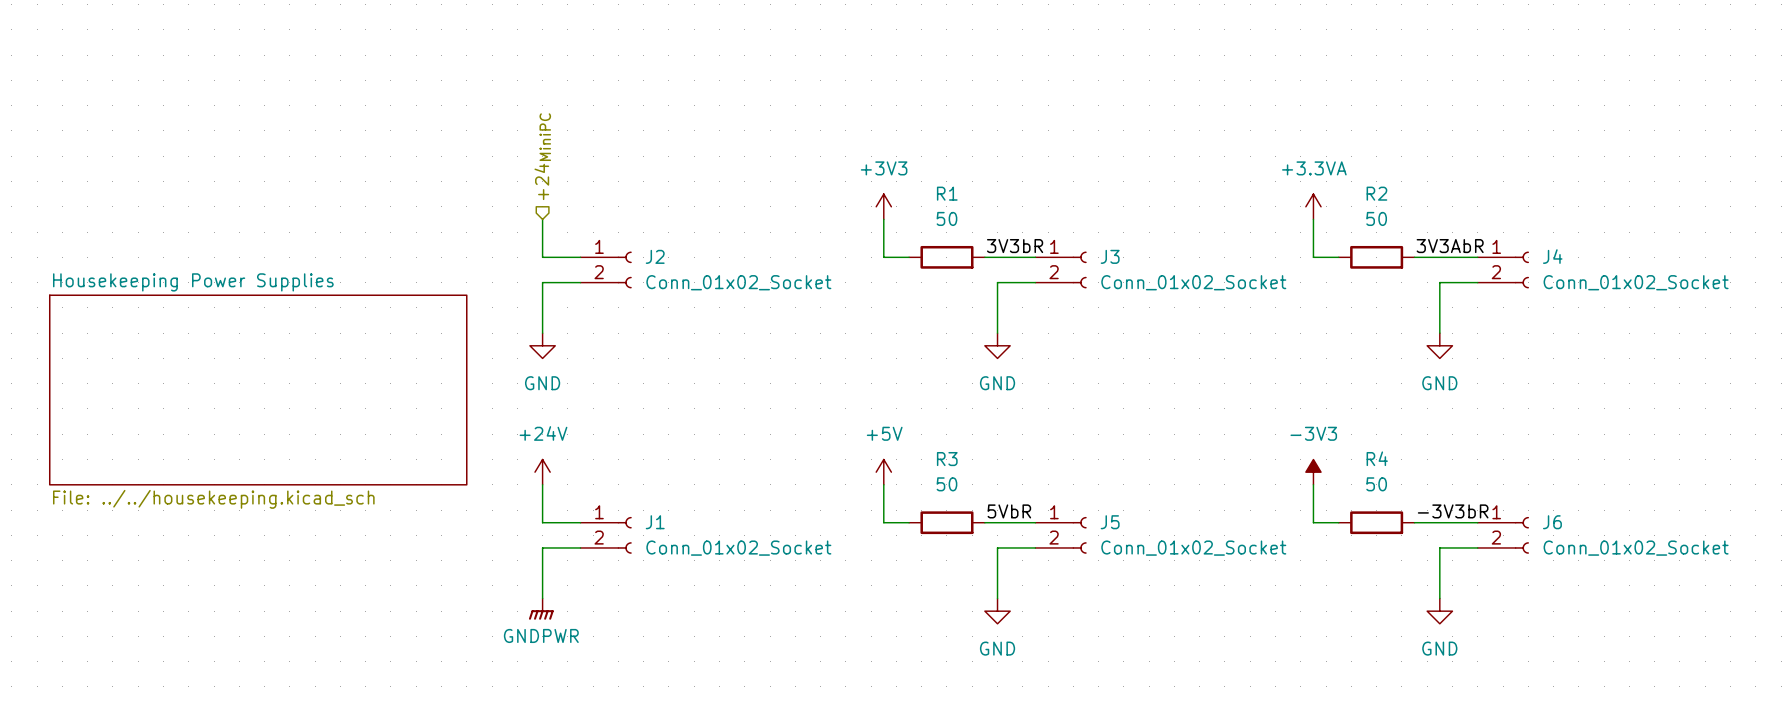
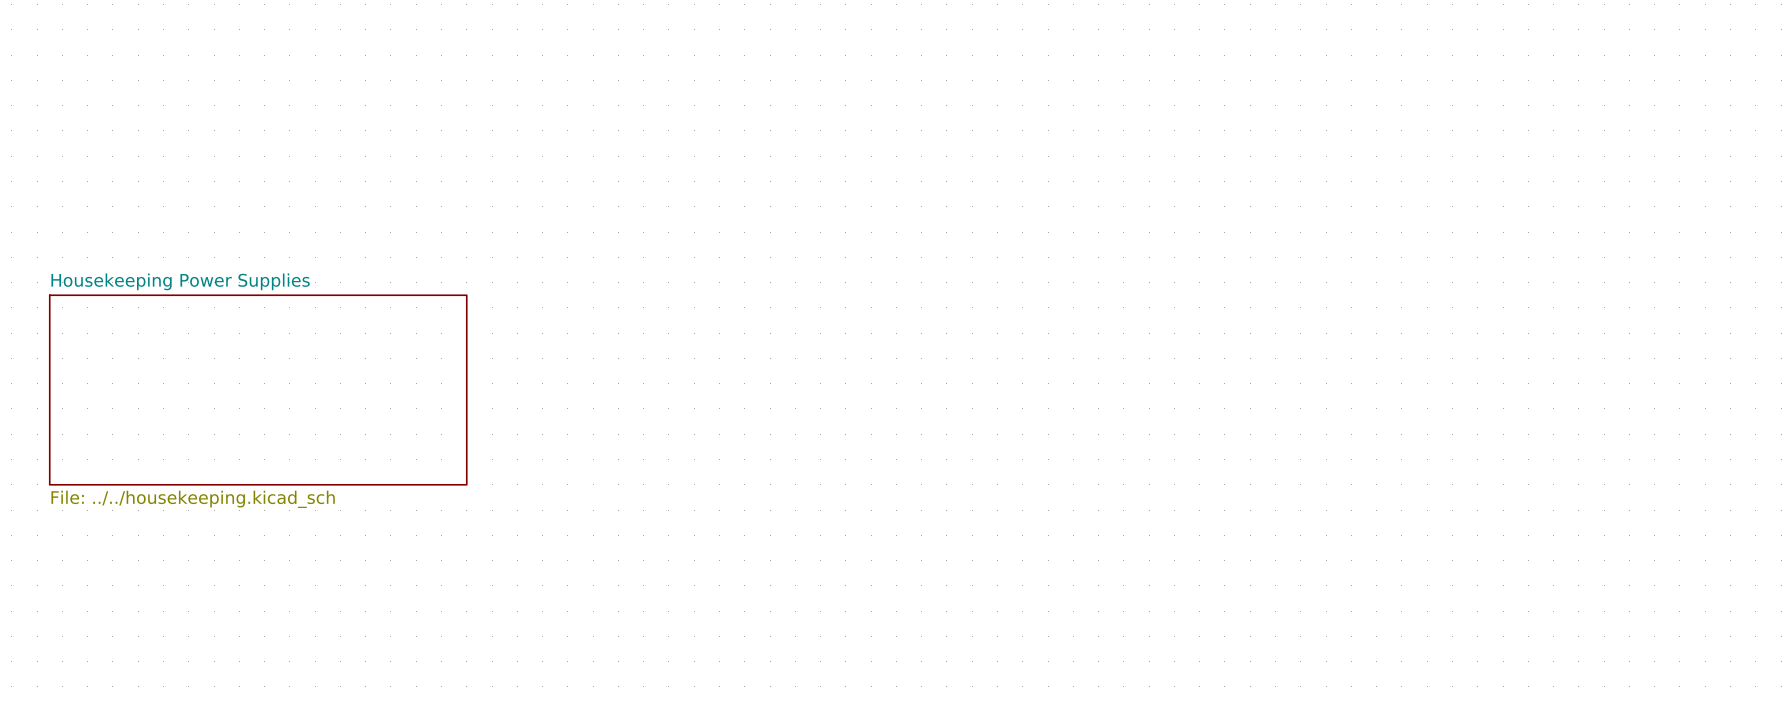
hierarchical label: +24MiniPC (542, 156) -> none
power symbol: +3V3 (883, 206) -> none
power symbol: +3.3VA (1313, 206) -> none
wire: (542, 219) (542, 257) (580, 257) -> none
wire: (883, 219) (883, 257) (909, 257) -> none
wire: (1313, 219) (1313, 257) (1338, 257) -> none
label: 3V3bR (1015, 246) -> none
label: 3V3AbR (1450, 246) -> none
R1: 50 (946, 257) -> none
wire: (984, 257) (1035, 257) -> none
R2: 50 (1376, 257) -> none
wire: (1414, 257) (1477, 257) -> none
J2: Conn_01x02_Socket (606, 269) -> none
J3: Conn_01x02_Socket (1061, 269) -> none
J4: Conn_01x02_Socket (1503, 269) -> none
wire: (580, 282) (542, 282) (542, 333) -> none
wire: (1035, 282) (997, 282) (997, 333) -> none
wire: (1477, 282) (1439, 282) (1439, 333) -> none
power symbol: GND (542, 345) -> none
power symbol: GND (997, 345) -> none
power symbol: GND (1439, 345) -> none
power symbol: +24V (542, 472) -> none
power symbol: +5V (883, 472) -> none
power symbol: -3V3 (1313, 472) -> none
wire: (542, 484) (542, 522) (580, 522) -> none
wire: (883, 484) (883, 522) (909, 522) -> none
wire: (1313, 484) (1313, 522) (1338, 522) -> none
label: 5VbR (1009, 511) -> none
label: -3V3bR (1453, 511) -> none
R3: 50 (946, 522) -> none
wire: (984, 522) (1035, 522) -> none
R4: 50 (1376, 522) -> none
wire: (1414, 522) (1477, 522) -> none
J1: Conn_01x02_Socket (606, 535) -> none
J5: Conn_01x02_Socket (1061, 535) -> none
J6: Conn_01x02_Socket (1503, 535) -> none
wire: (580, 547) (542, 547) (542, 598) -> none
wire: (1035, 547) (997, 547) (997, 598) -> none
wire: (1477, 547) (1439, 547) (1439, 598) -> none
power symbol: GNDPWR (541, 609) -> none
power symbol: GND (997, 611) -> none
power symbol: GND (1439, 611) -> none

